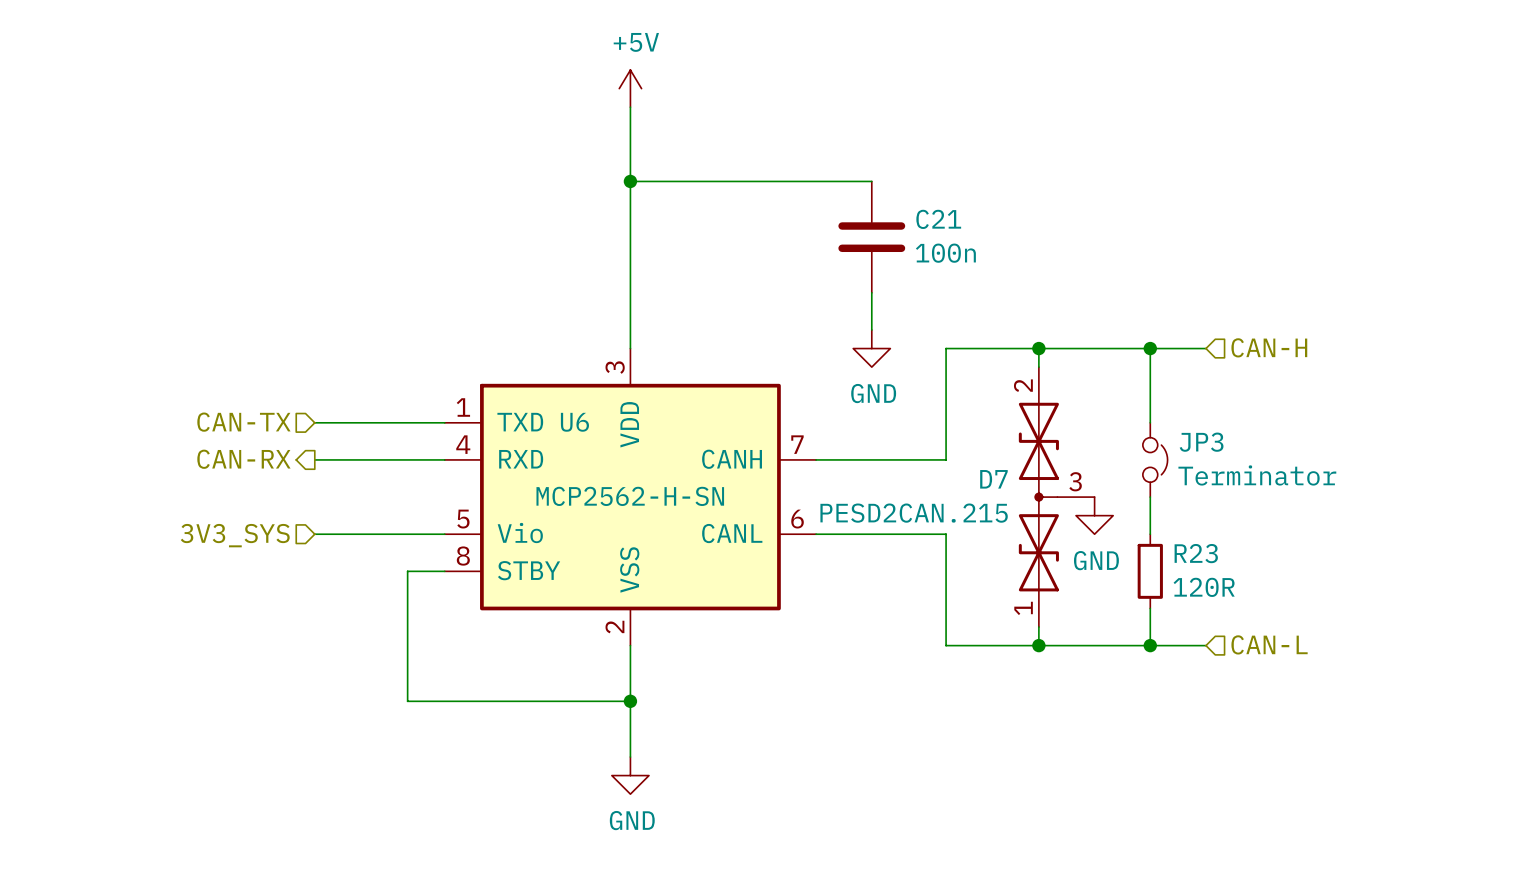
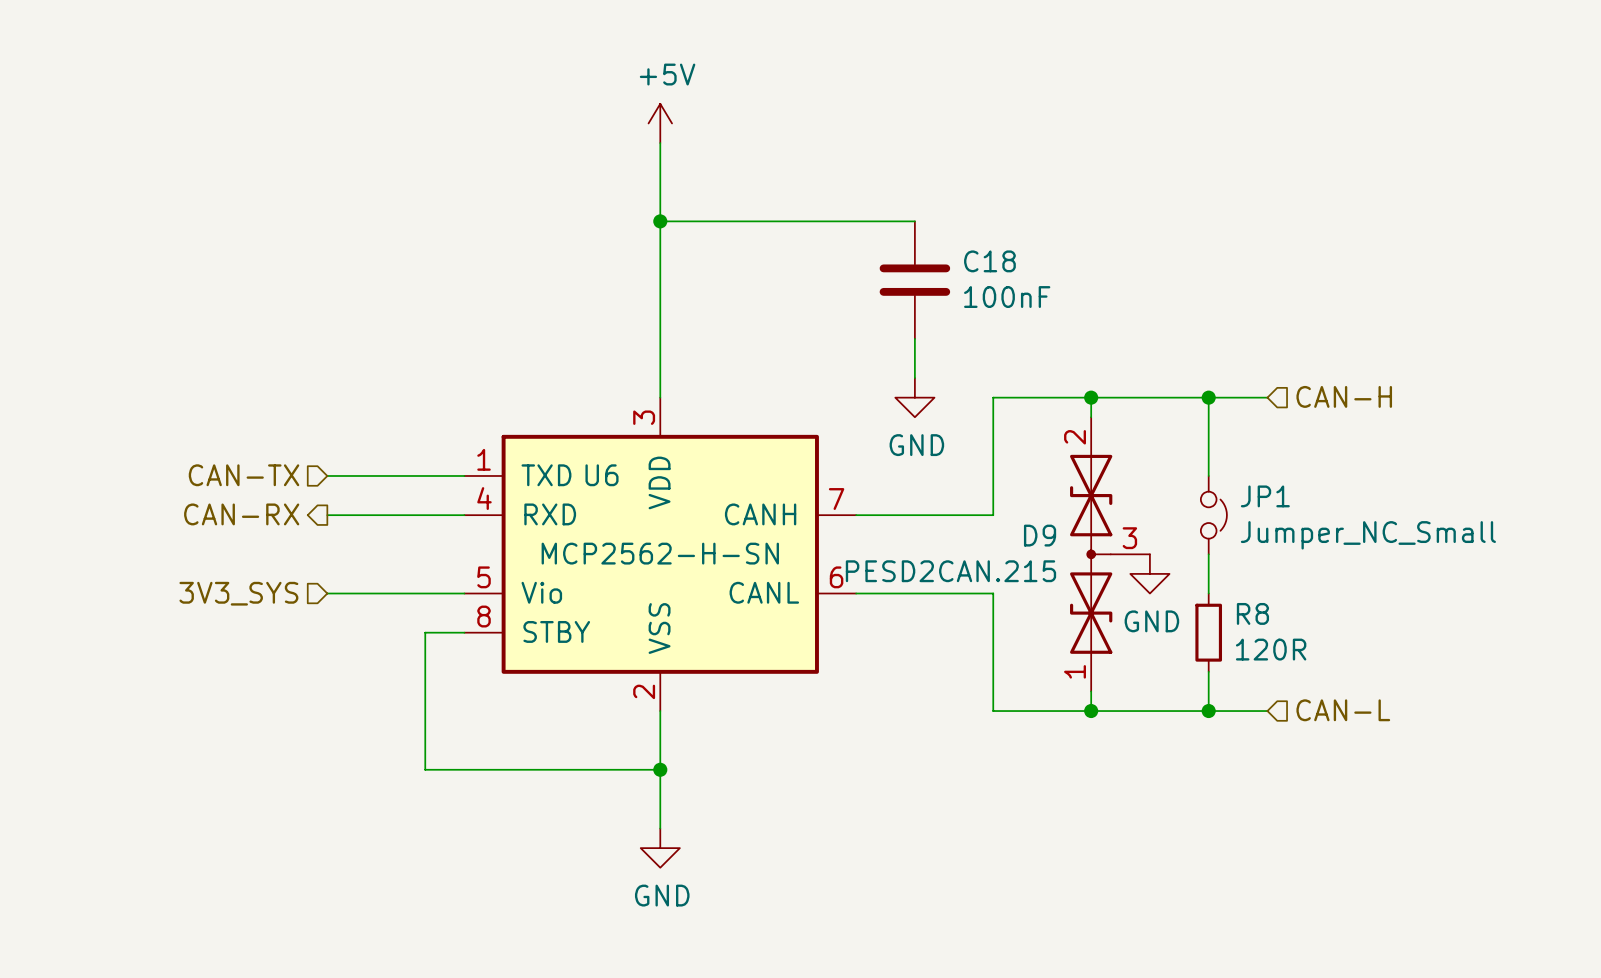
C21 name: C21 (938, 219) -> C18 (989, 261)
C21 value: 100n (945, 253) -> 100nF (1007, 297)
JP3 name: JP3 (1201, 442) -> JP1 (1265, 496)
JP3 value: Terminator (1257, 475) -> Jumper_NC_Small (1368, 535)
D7 name: D7 (993, 479) -> D9 (1040, 535)
R23 name: R23 (1196, 553) -> R8 (1252, 613)

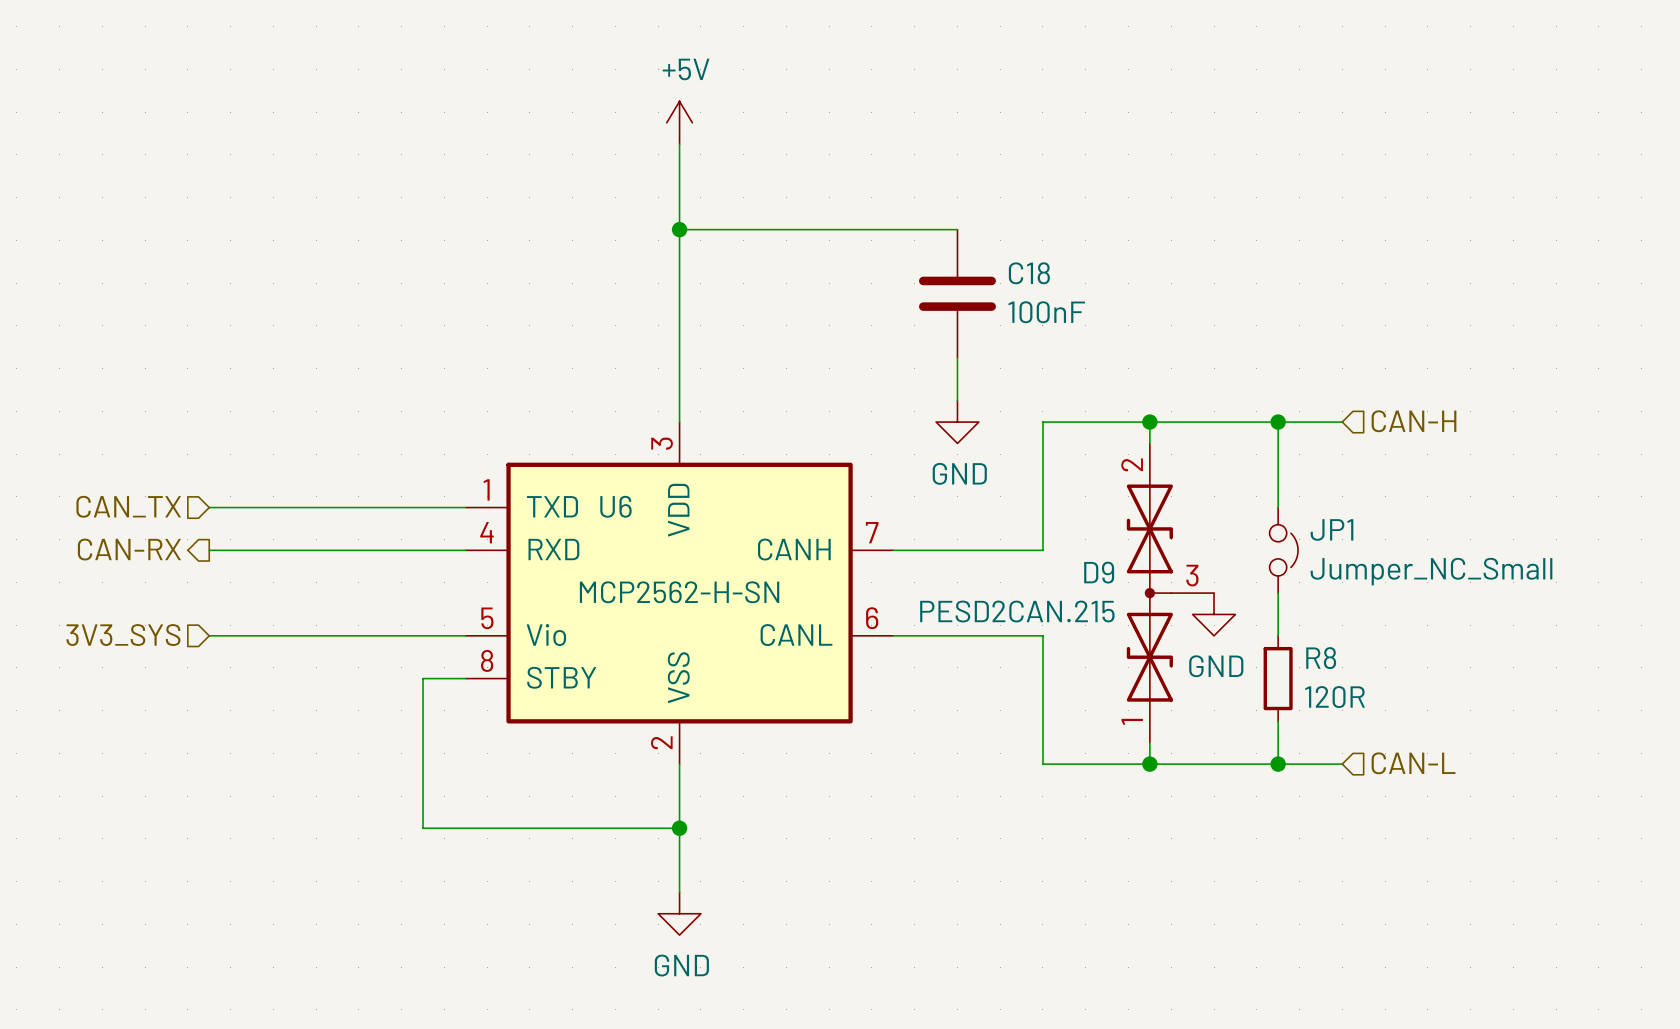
wire: none -> (209, 507) (316, 507)
hierarchical label: CAN-TX (244, 475) -> CAN_TX (128, 506)
hierarchical label position: CAN-RX (241, 514) -> CAN-RX (129, 549)
wire: none -> (209, 550) (316, 550)
wire: none -> (209, 635) (316, 635)
hierarchical label position: 3V3_SYS (238, 593) -> 3V3_SYS (123, 635)

